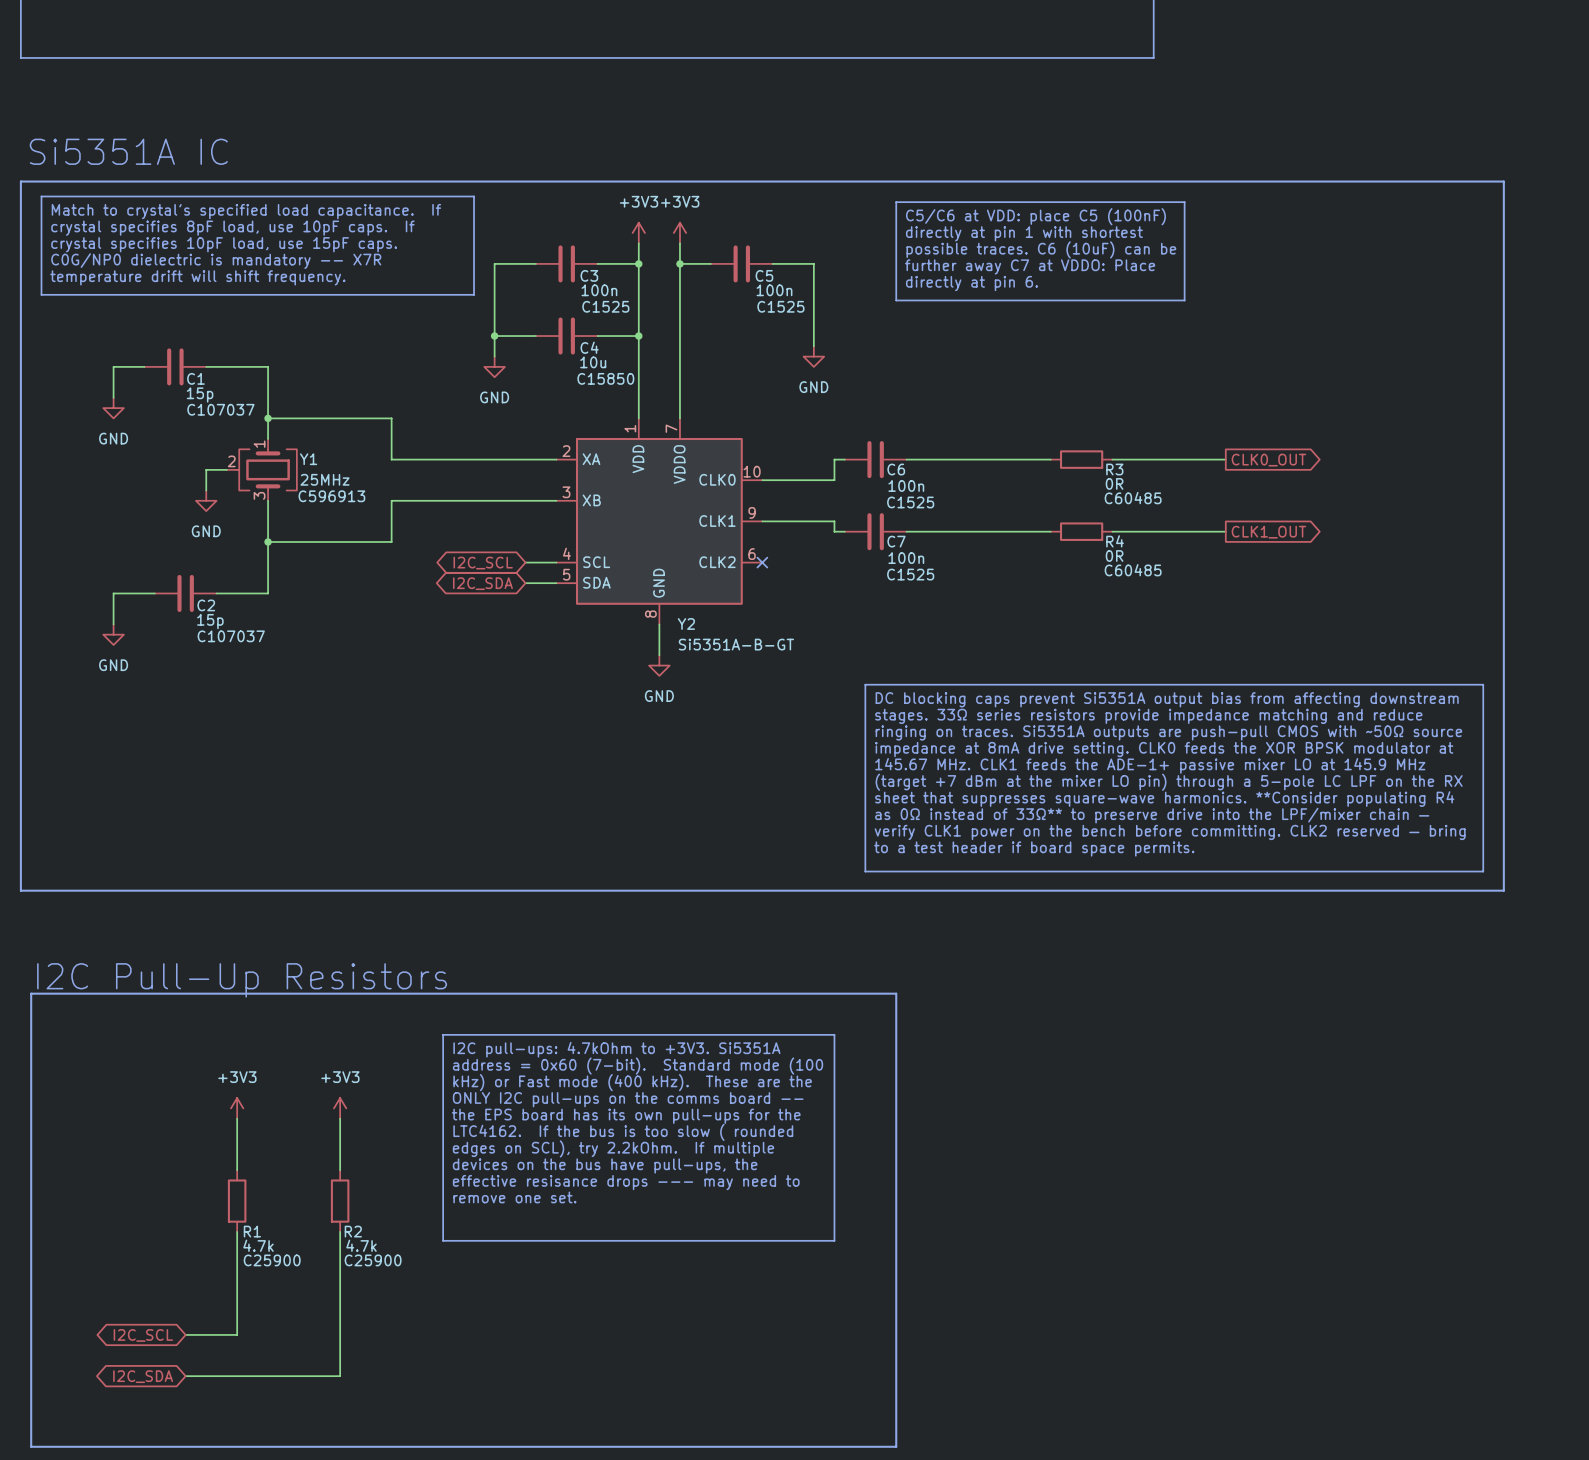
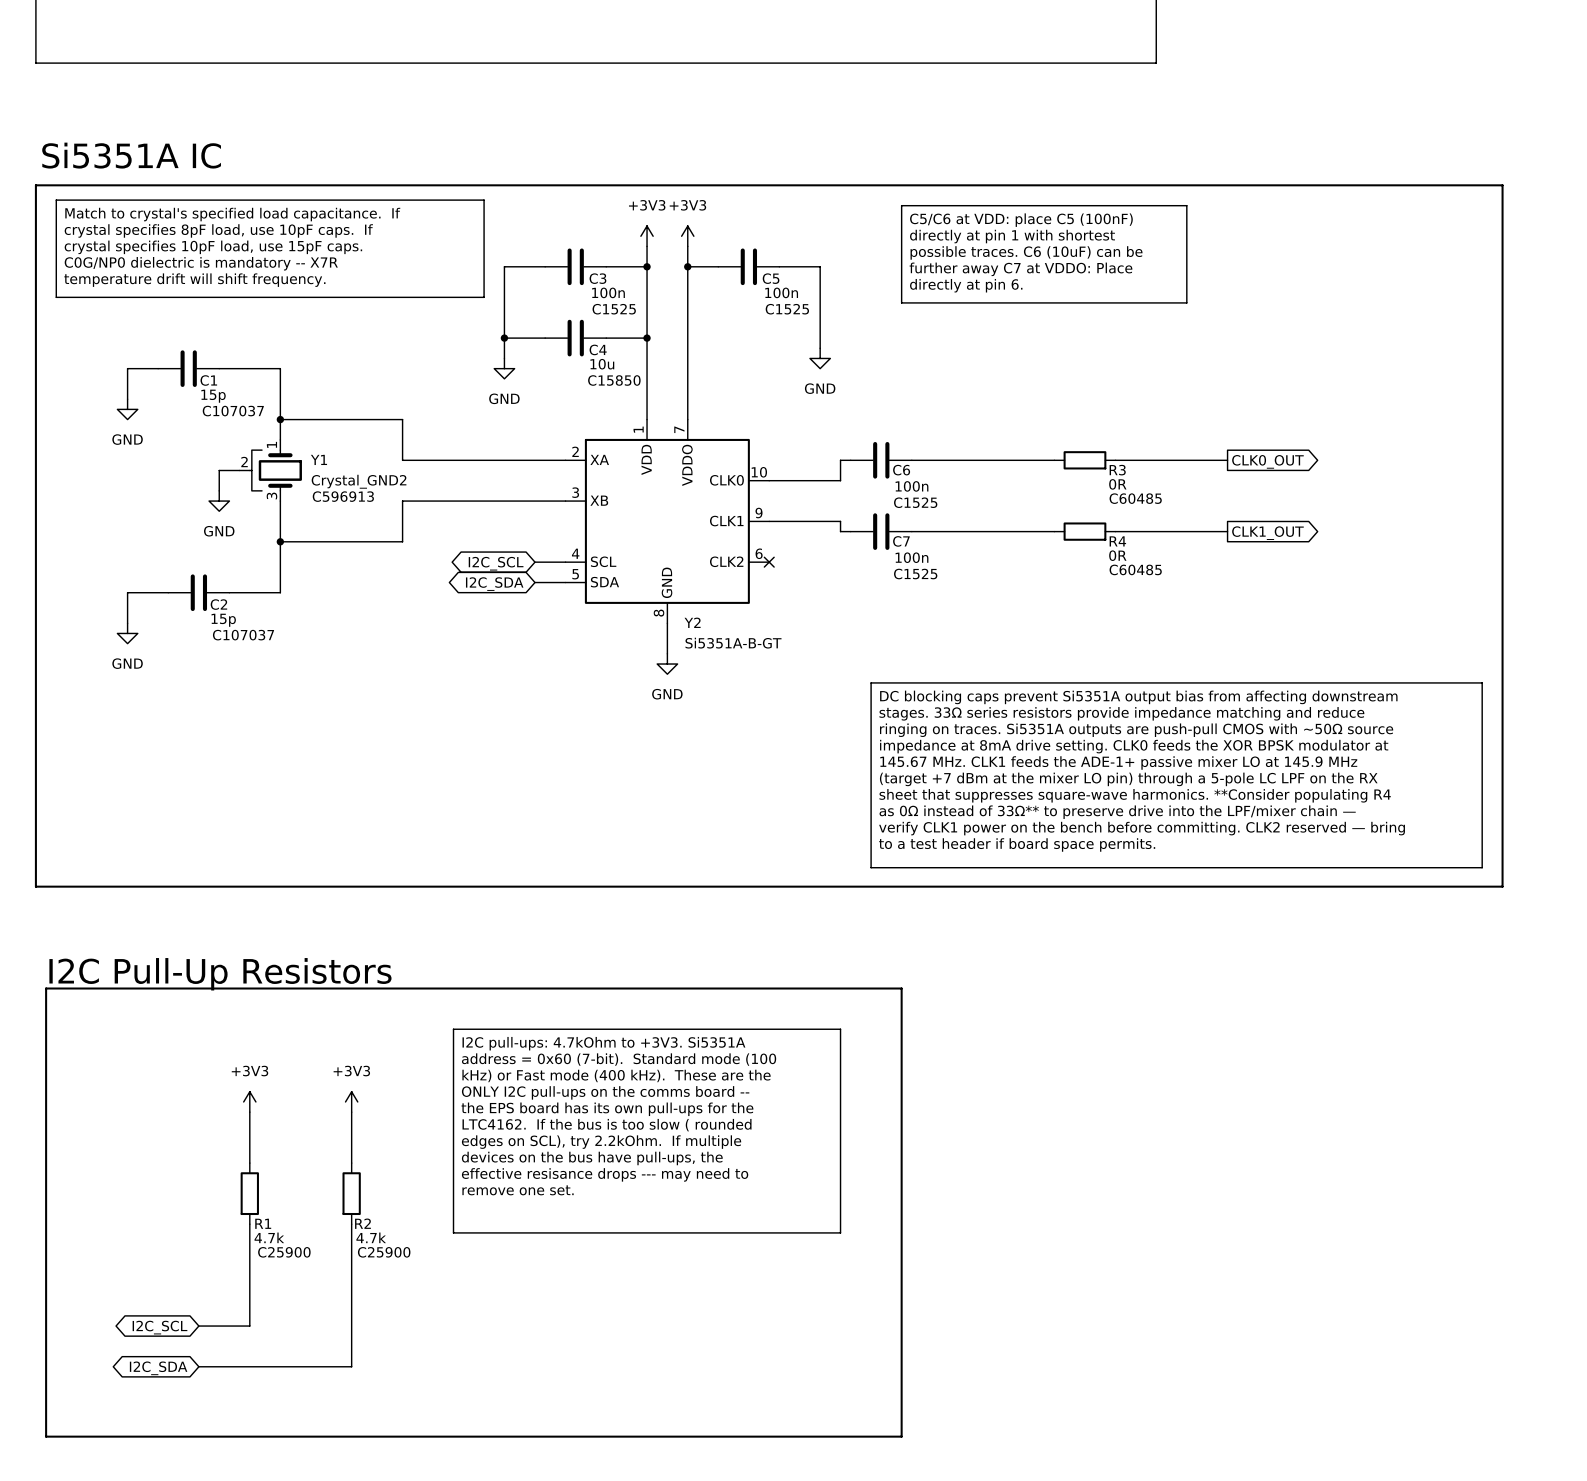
Y1 symbol: [226, 439, 297, 501] -> [239, 439, 302, 502]
Y1 value: 25MHz (325, 479) -> Crystal_GND2 (359, 481)

